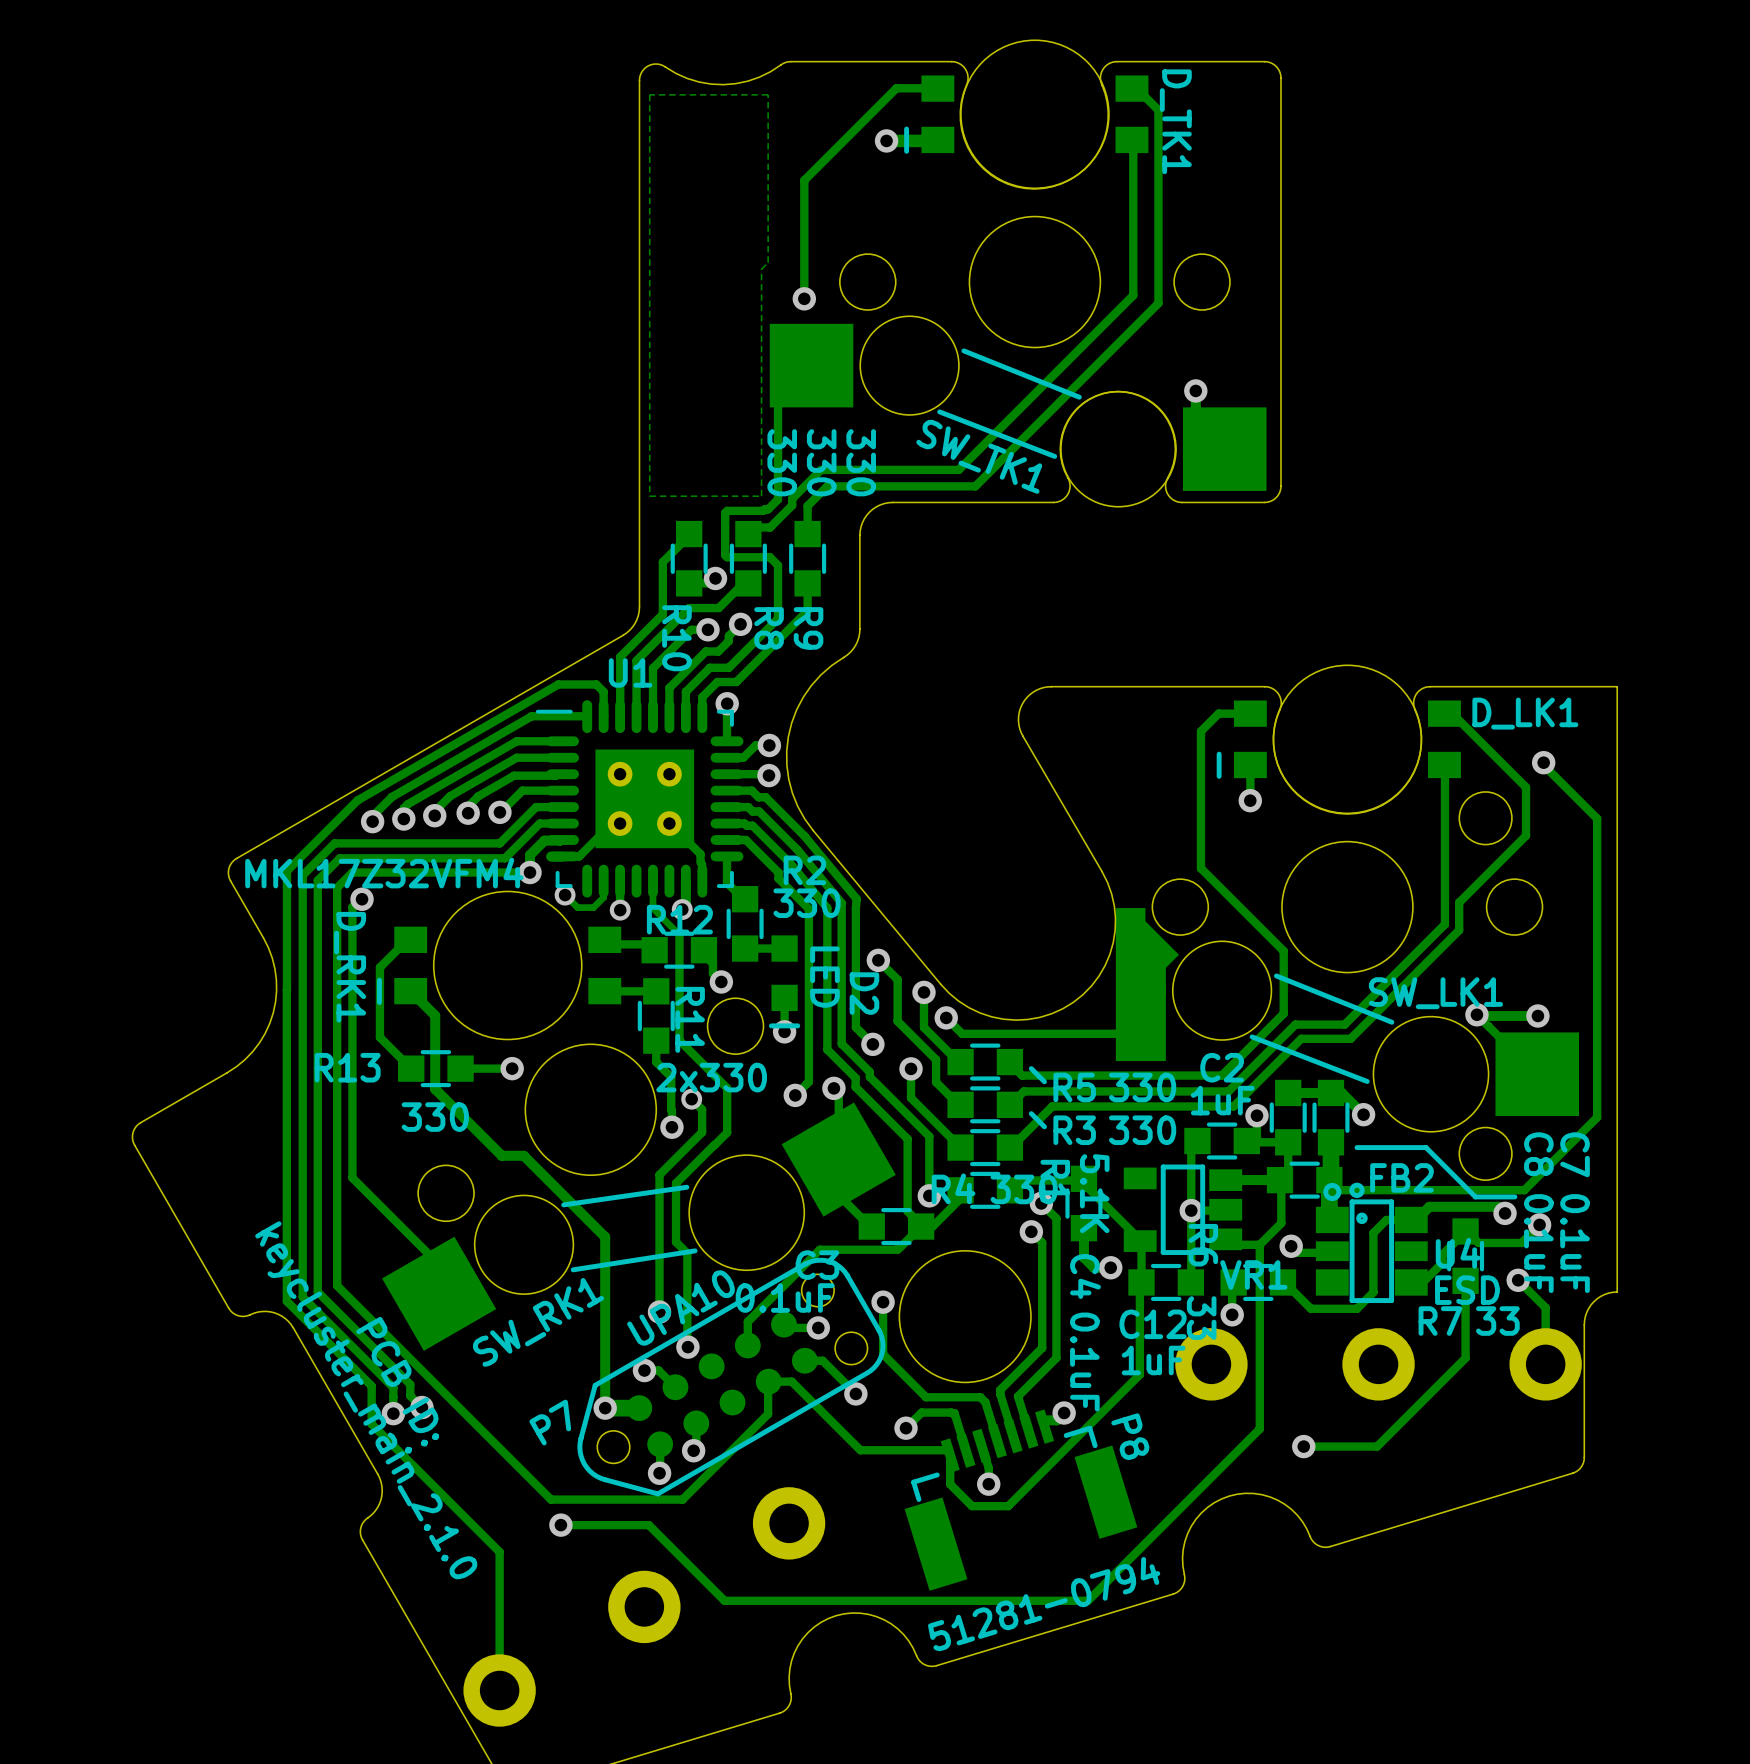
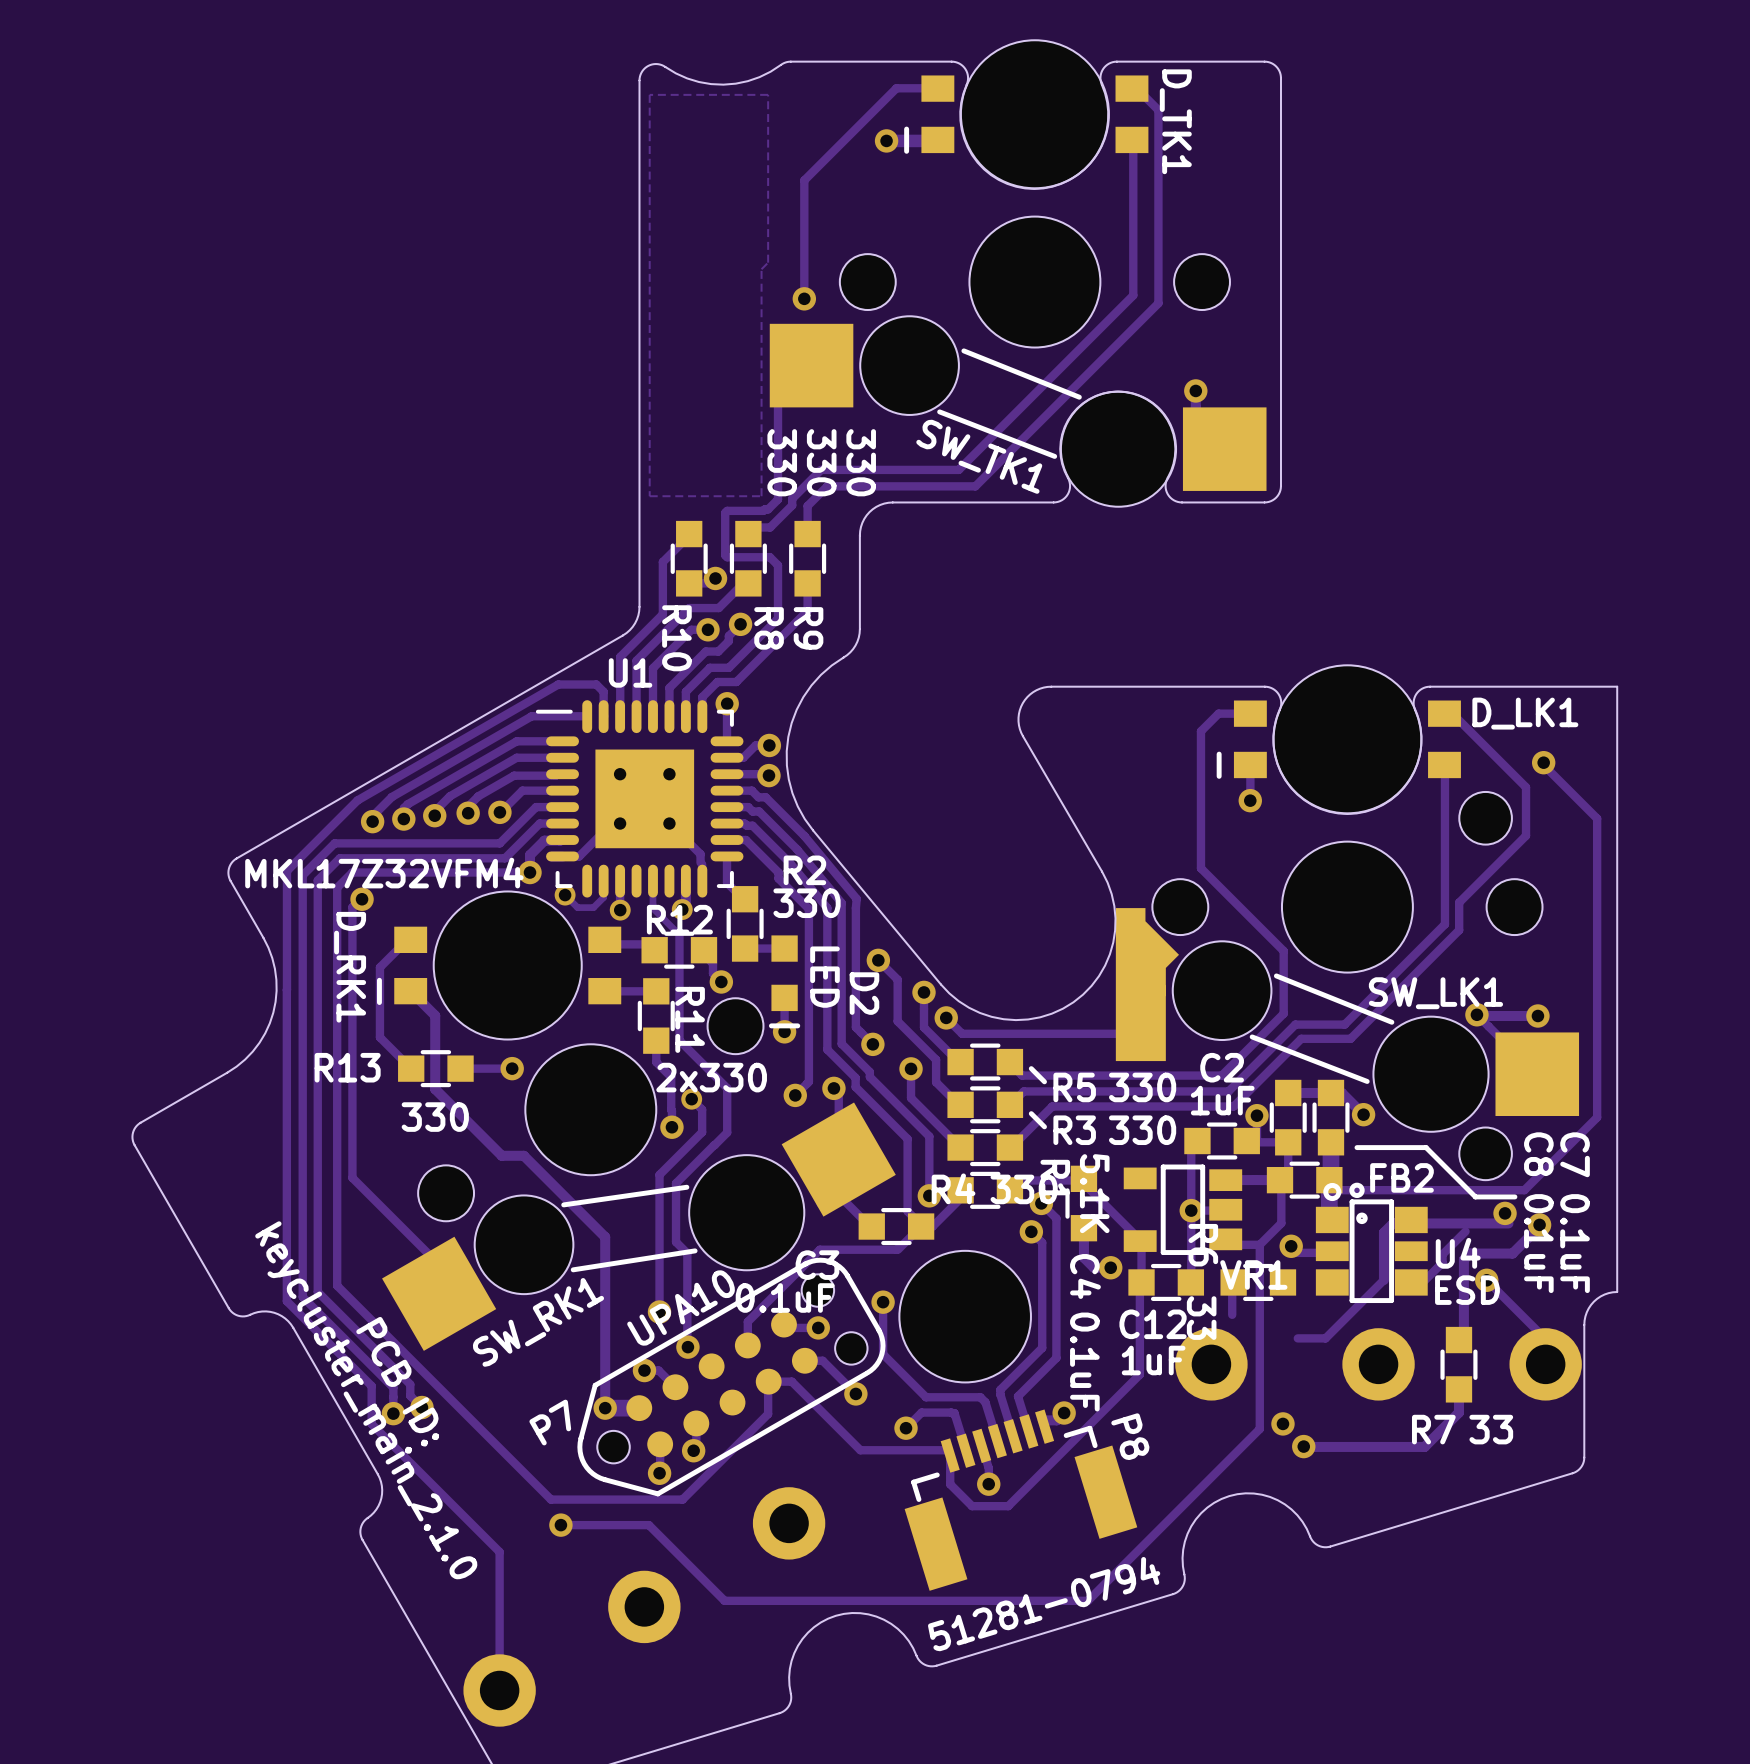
track: (1505, 1213) (1498, 1206) (1429, 1206) (1416, 1219) -> (1508, 1223) (1419, 1223) (1416, 1219)
track: (1411, 1219) (1386, 1219) (1373, 1232) (1373, 1292) (1357, 1308) (1310, 1308) (1291, 1289) -> none
track: none -> (1401, 1223) (1393, 1223) (1383, 1232) (1383, 1279) (1325, 1338) (1297, 1338)
track: (1539, 1224) (1521, 1242) (1478, 1242) (1472, 1236) -> none
track: none -> (1539, 1226) (1512, 1253) (1470, 1253) (1463, 1259) (1463, 1338)
R7 position: (1465, 1256) -> (1458, 1364)
track: (1518, 1280) (1545, 1307) (1545, 1339) -> (1486, 1280) (1545, 1339)
via position: (1518, 1280) -> (1486, 1280)
track: (1465, 1285) (1465, 1358) (1377, 1446) (1303, 1446) -> (1458, 1389) (1458, 1412) (1424, 1446) (1304, 1446)
via position: (1232, 1314) -> (1282, 1423)

